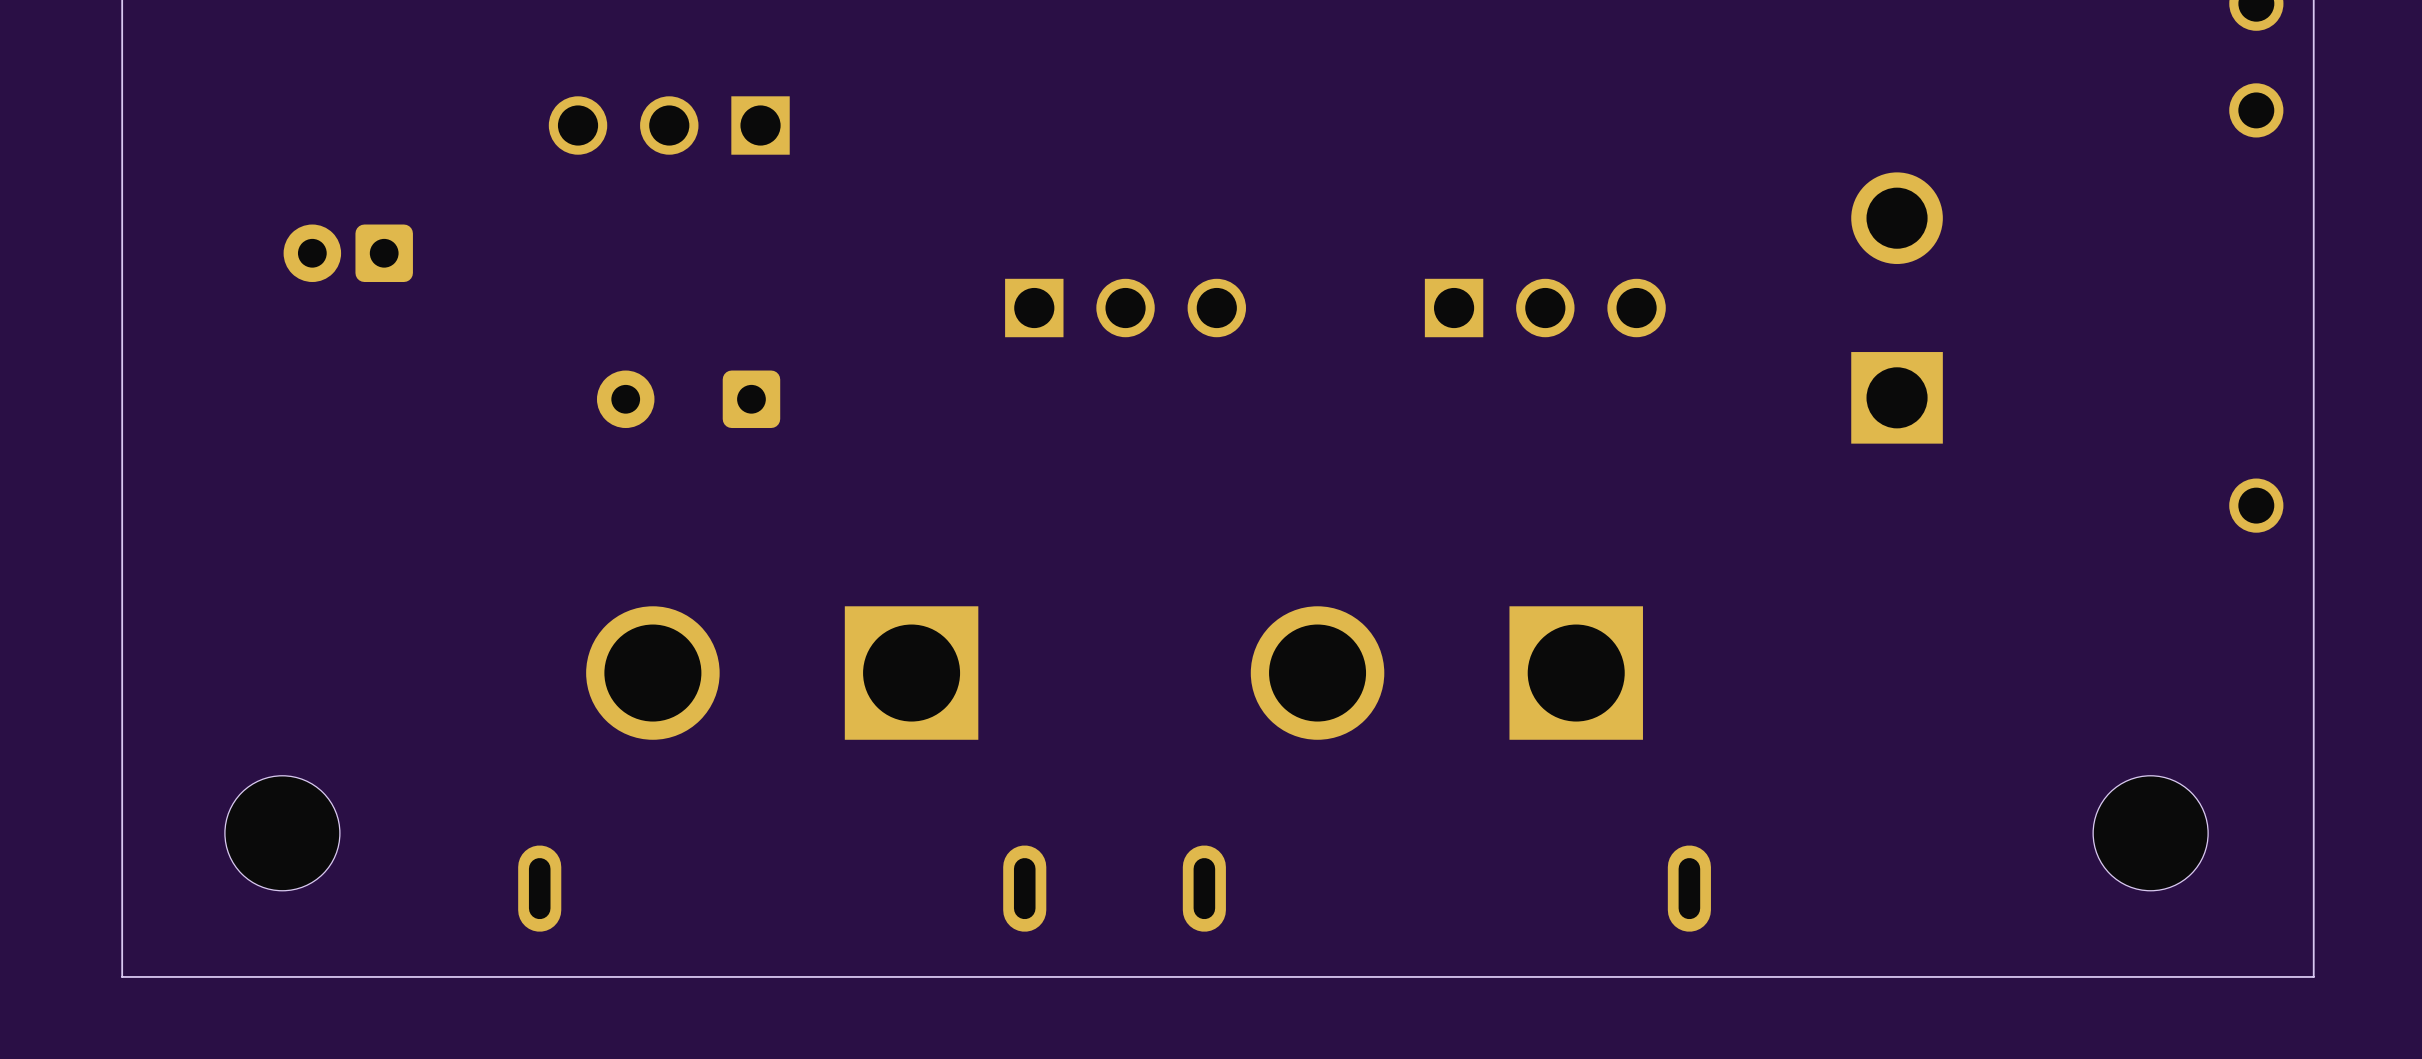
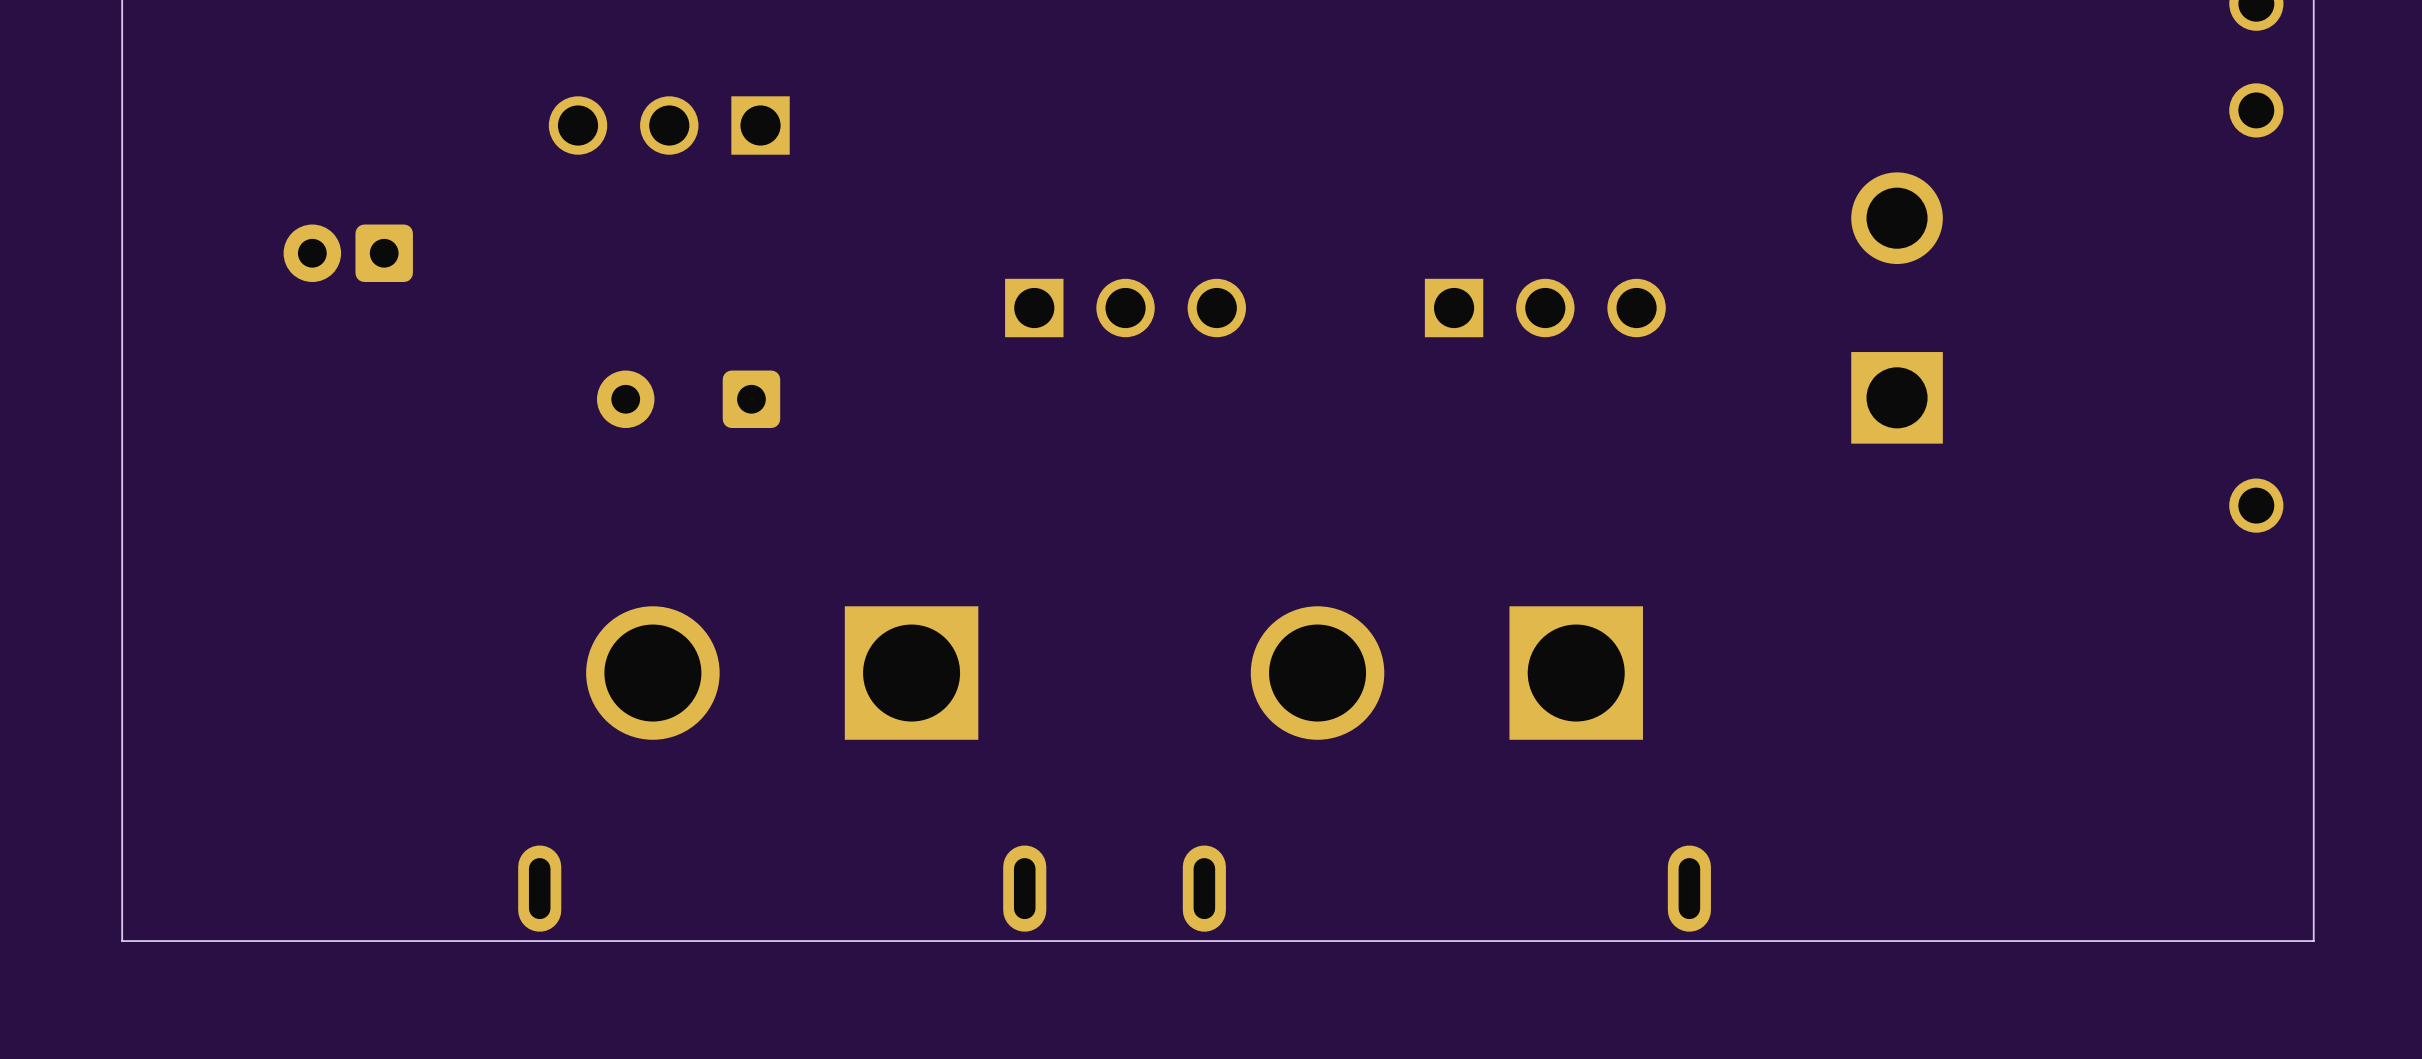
part: (282, 833) -> none
part: (2150, 833) -> none
board edge: (2313, 941) (2313, 976) (122, 976) (122, 941) -> (2313, 941) (122, 941)

